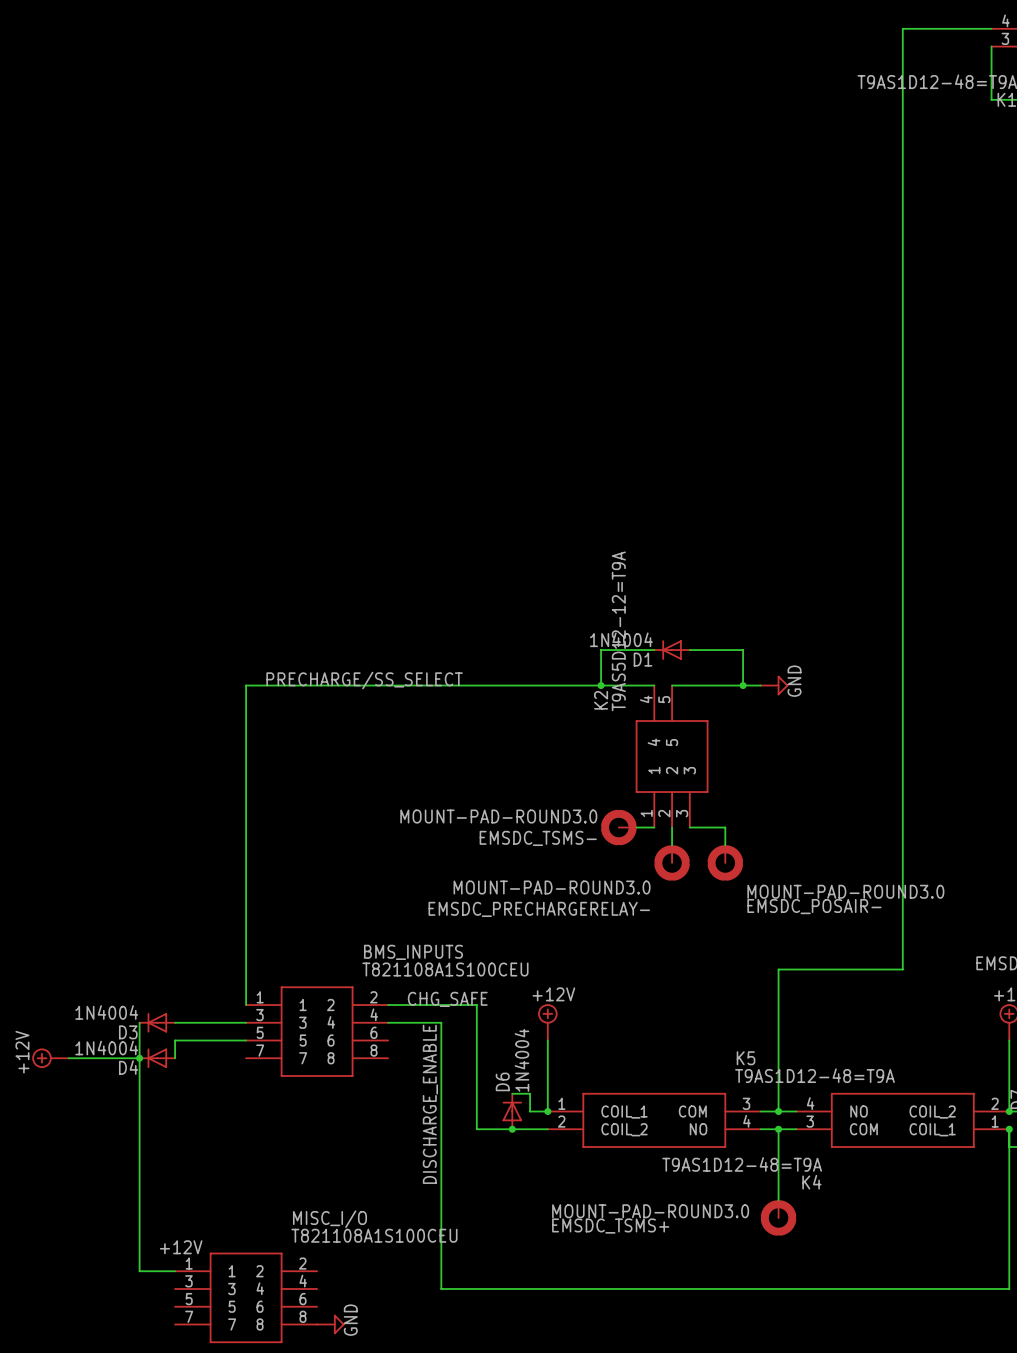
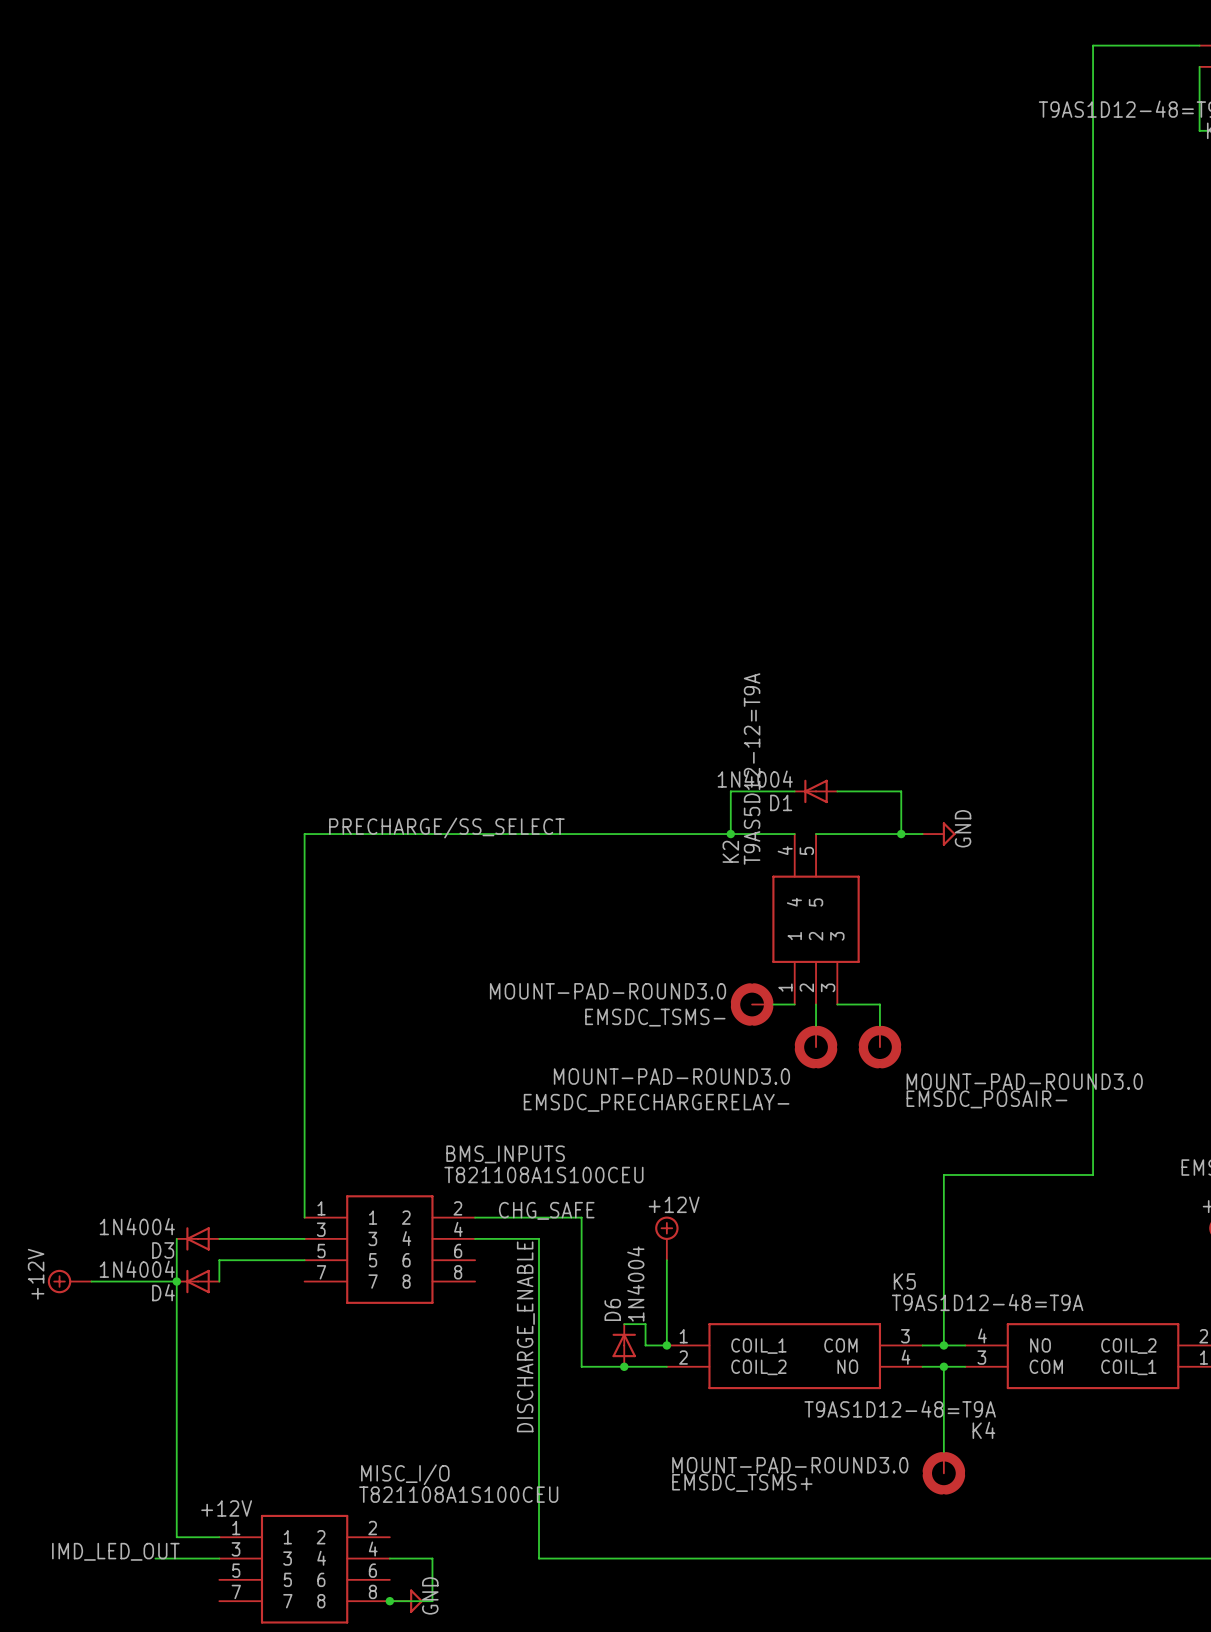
label: none -> IMD_LED_OUT (115, 1551)
wire: none -> (155, 1558) (219, 1558)
wire: none -> (389, 1558) (432, 1558) (432, 1601) (389, 1601)
junction: none -> (389, 1601)

